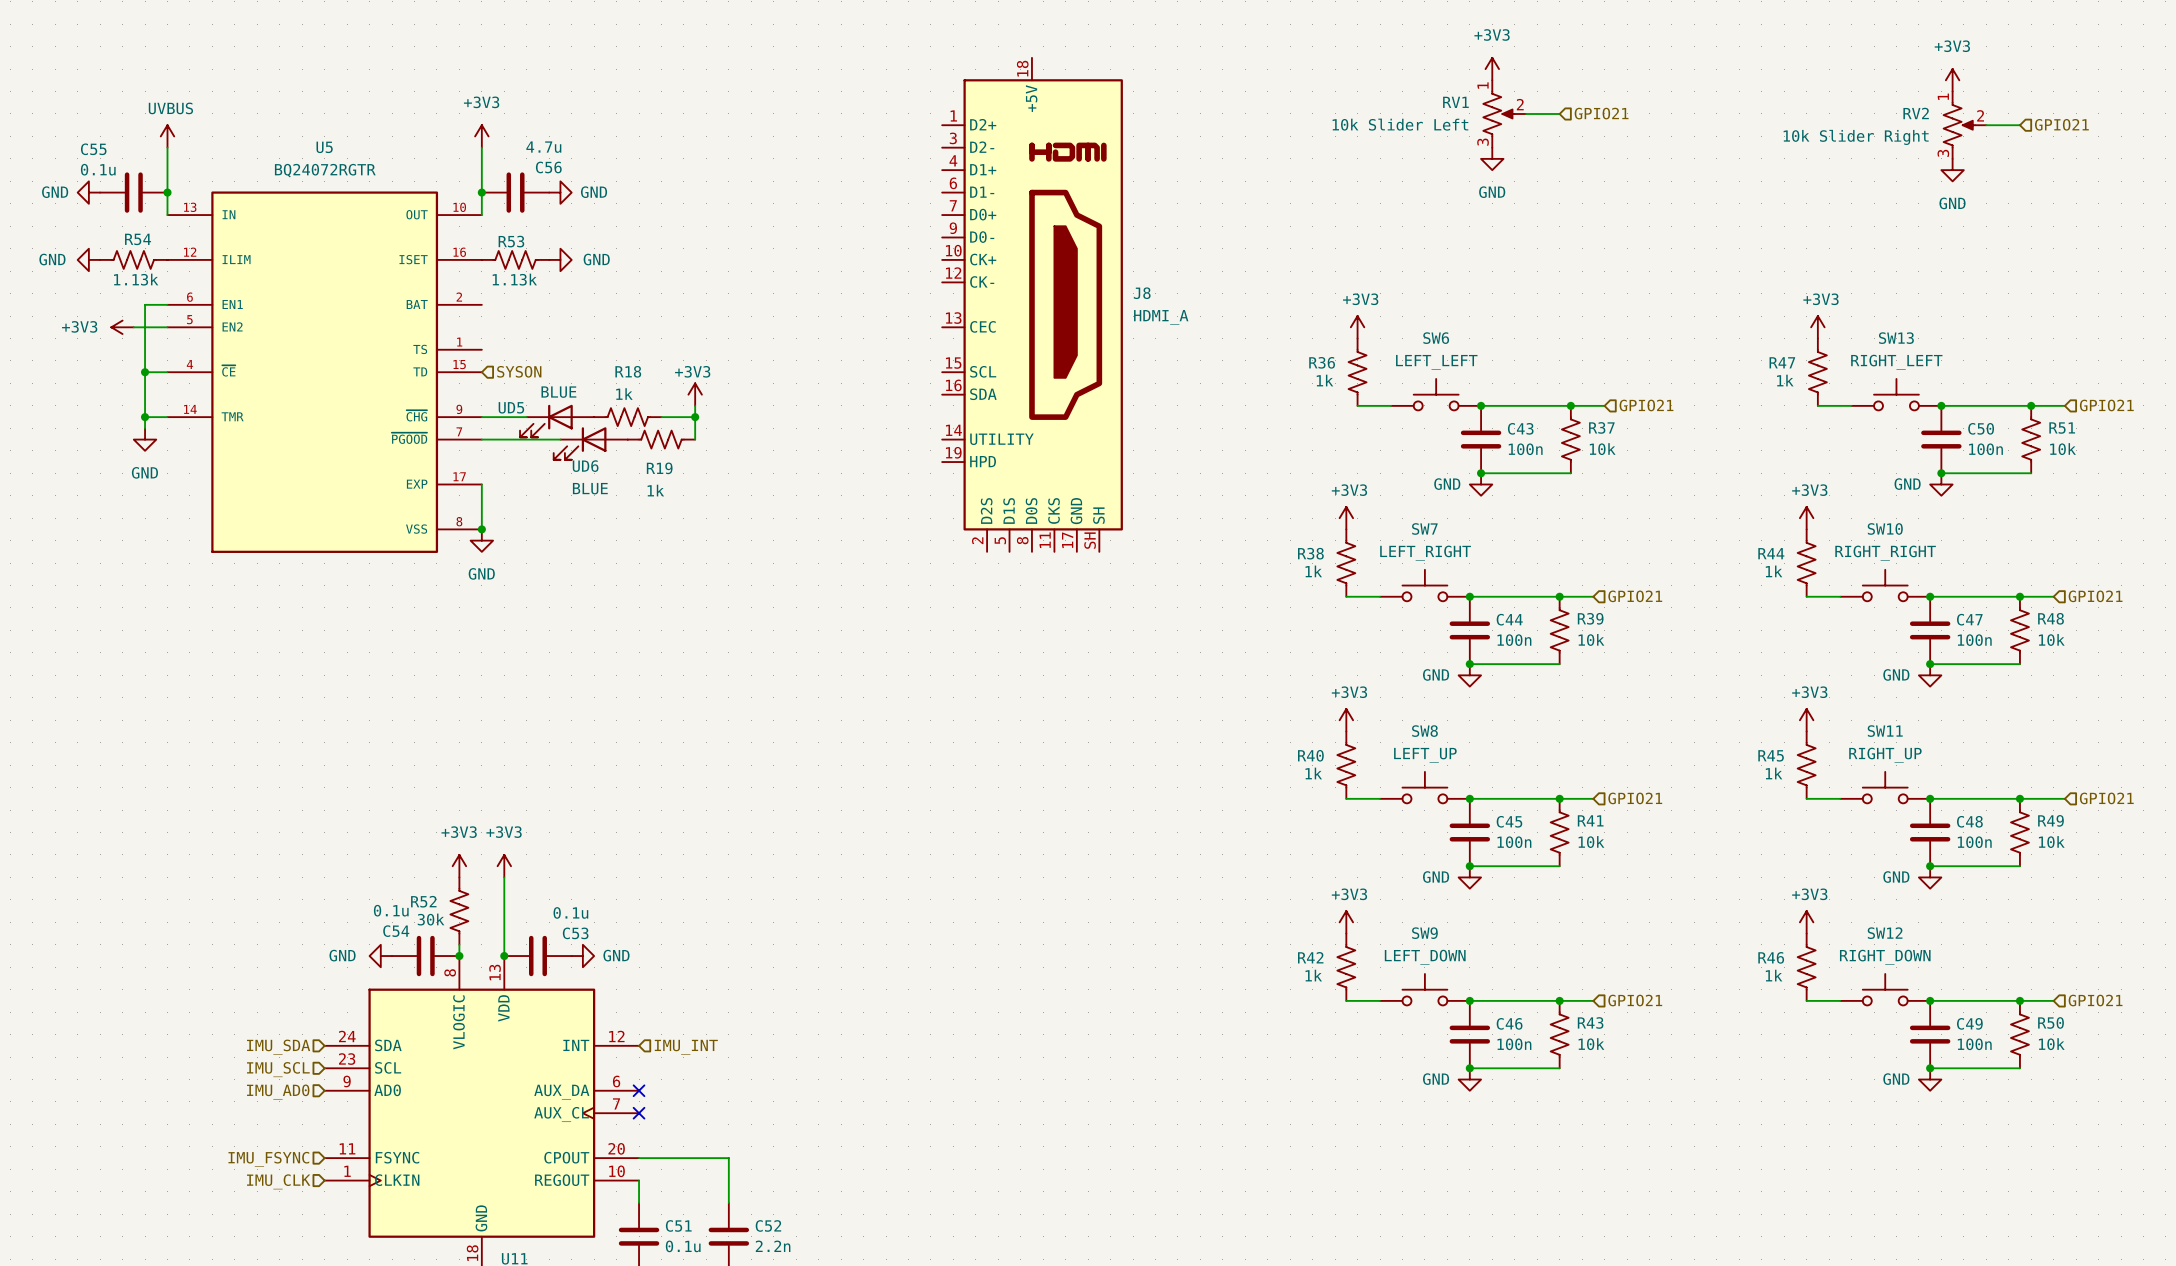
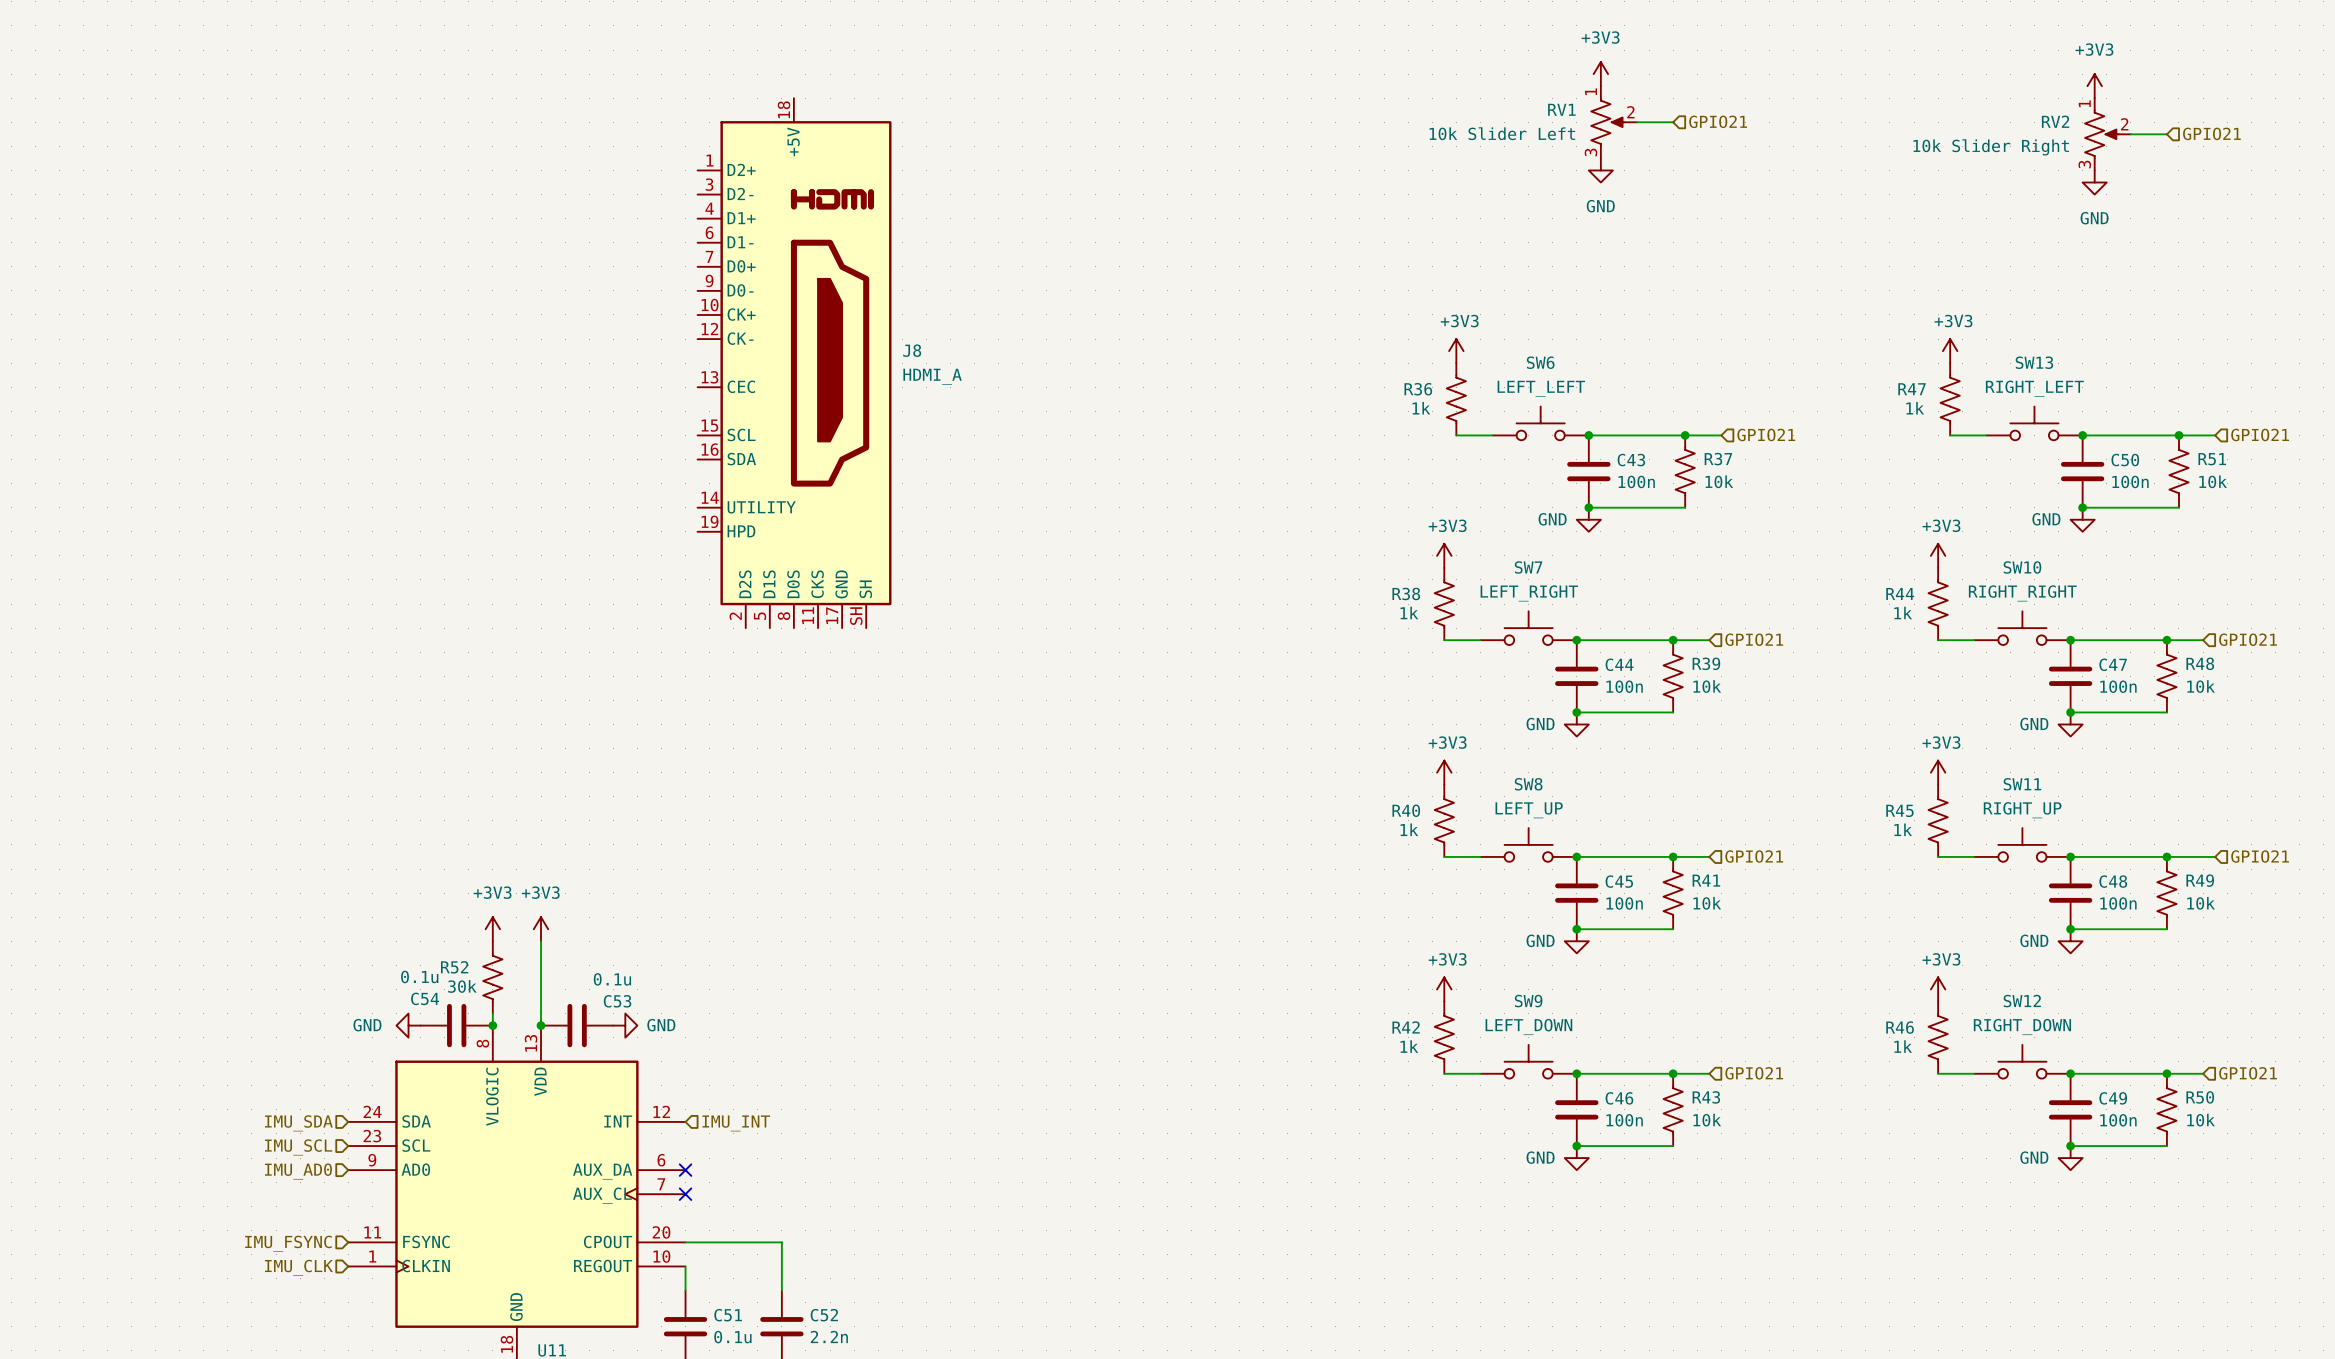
power symbol: UVBUS (167, 136) -> none
power symbol: +3V3 (481, 136) -> none
wire: (167, 147) (167, 215) -> none
wire: (481, 147) (481, 215) -> none
power symbol: GND (88, 192) -> none
C55: 0.1u (133, 192) -> none
junction: (167, 192) -> none
junction: (481, 192) -> none
C56: 4.7u (515, 192) -> none
power symbol: GND (560, 192) -> none
power symbol: GND (88, 259) -> none
R54: 1.13k (133, 259) -> none
R53: 1.13k (515, 259) -> none
power symbol: GND (560, 259) -> none
wire: (167, 304) (145, 304) (145, 428) -> none
J8 position: (1032, 304) -> (794, 363)
power symbol: +3V3 (122, 327) -> none
wire: (133, 327) (167, 327) -> none
hierarchical label: SYSON (519, 371) -> none
wire: (145, 372) (167, 372) -> none
junction: (145, 372) -> none
U5: BQ24072RGTR (324, 372) -> none
power symbol: +3V3 (695, 394) -> none
wire: (145, 417) (167, 417) -> none
junction: (145, 417) -> none
wire: (481, 417) (526, 417) -> none
R18: 1k (627, 417) -> none
junction: (695, 417) -> none
UD5: BLUE (557, 421) -> none
power symbol: GND (145, 439) -> none
wire: (481, 439) (560, 439) -> none
R19: 1k (661, 439) -> none
UD6: BLUE (590, 443) -> none
wire: (481, 484) (481, 529) -> none
junction: (481, 529) -> none
power symbol: GND (481, 540) -> none

